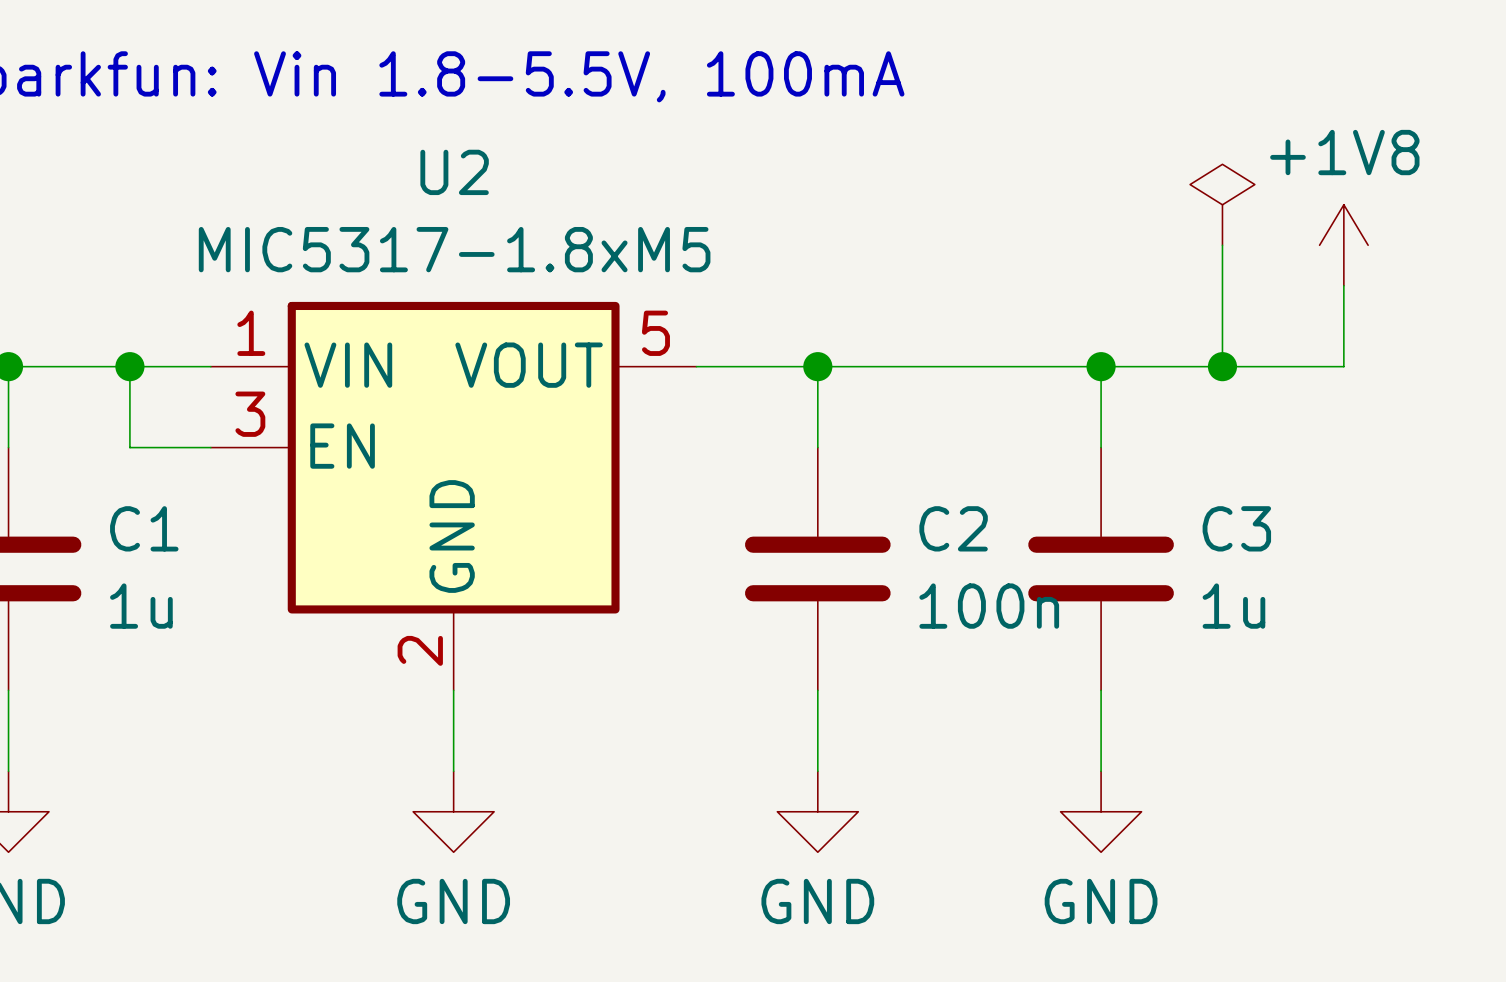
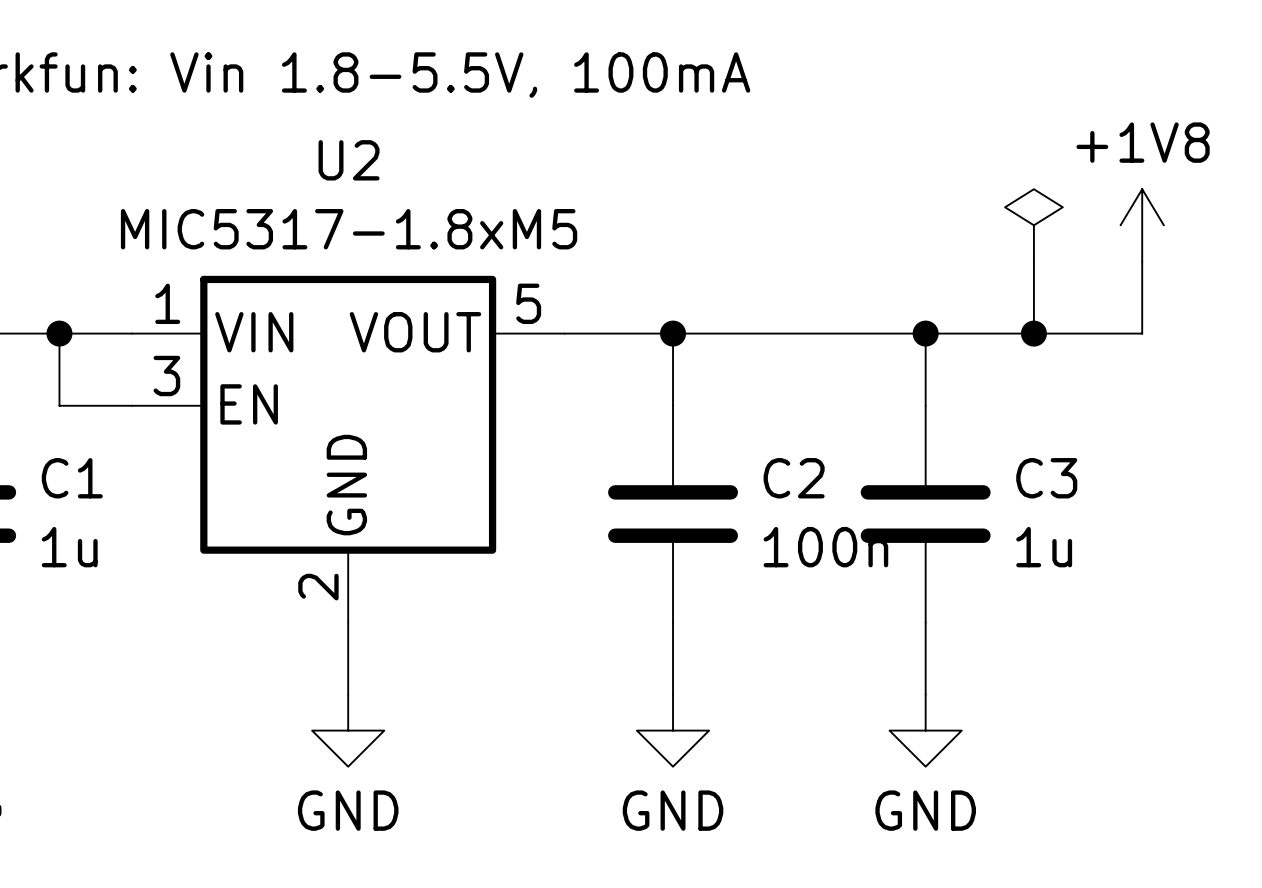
power symbol position: (1222, 204) -> (1033, 225)

